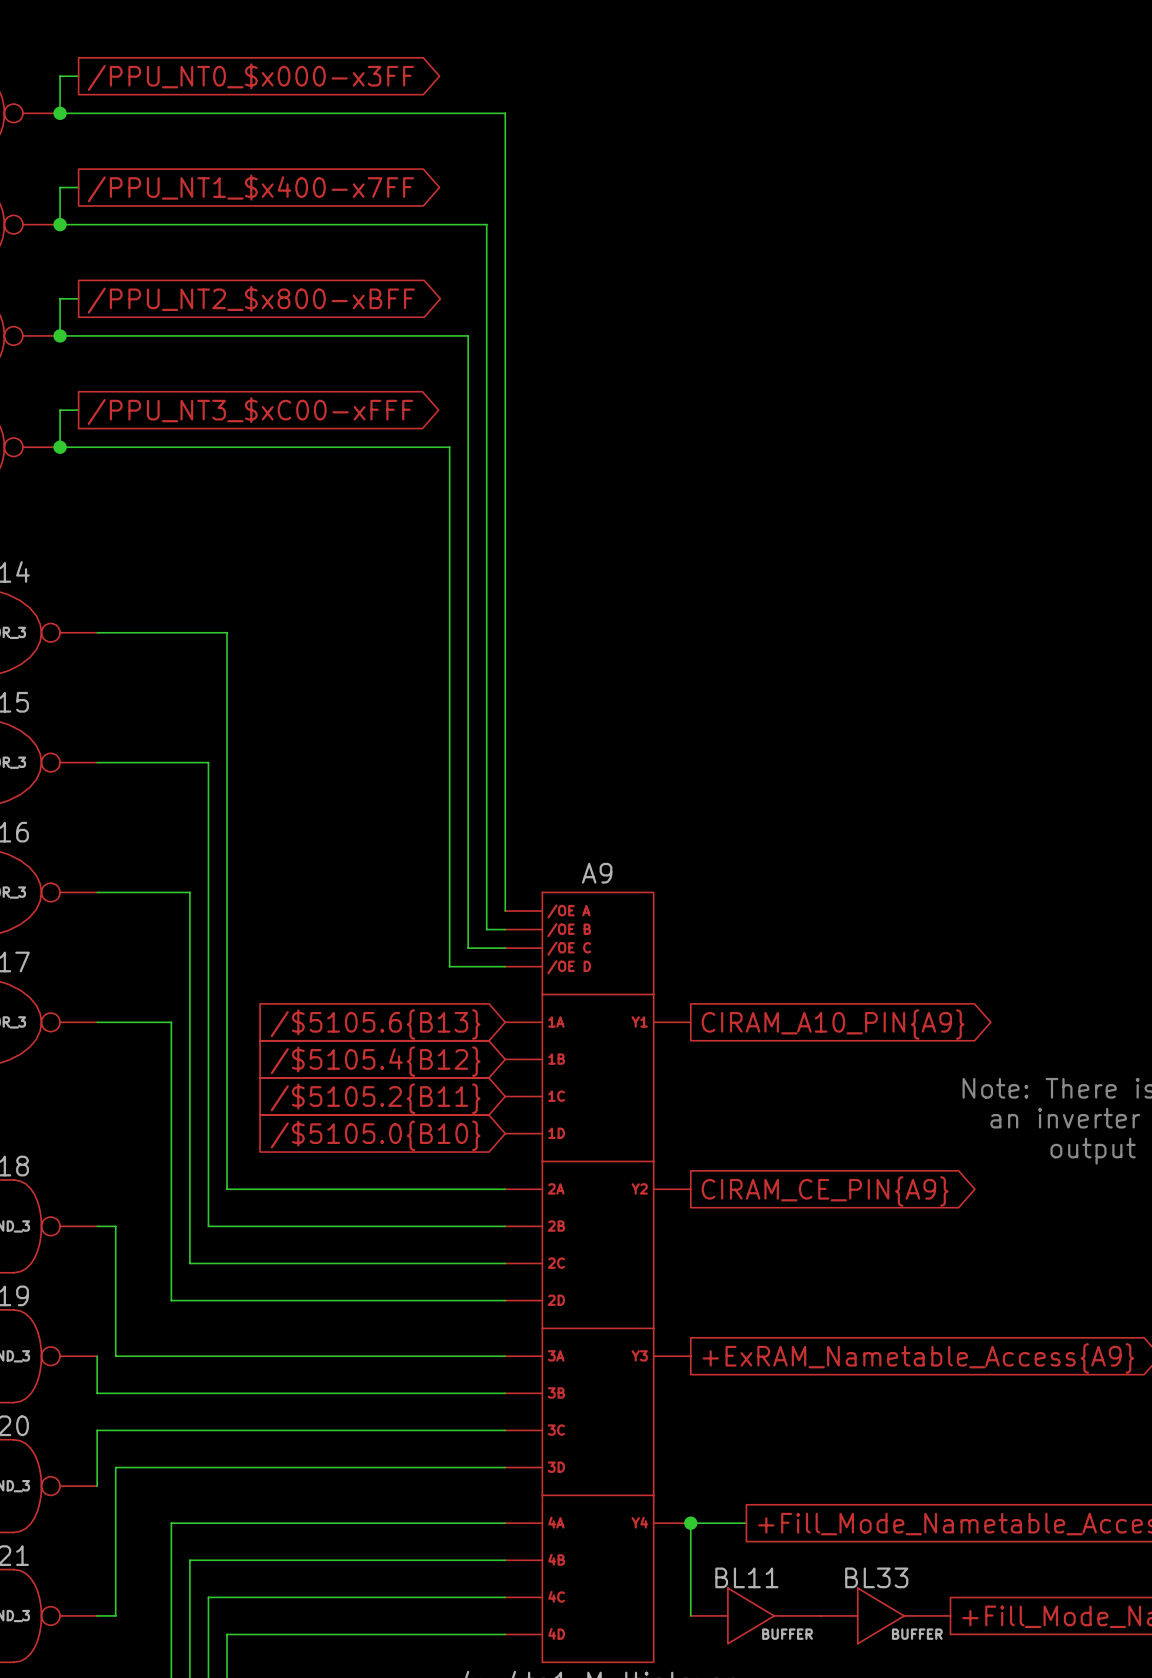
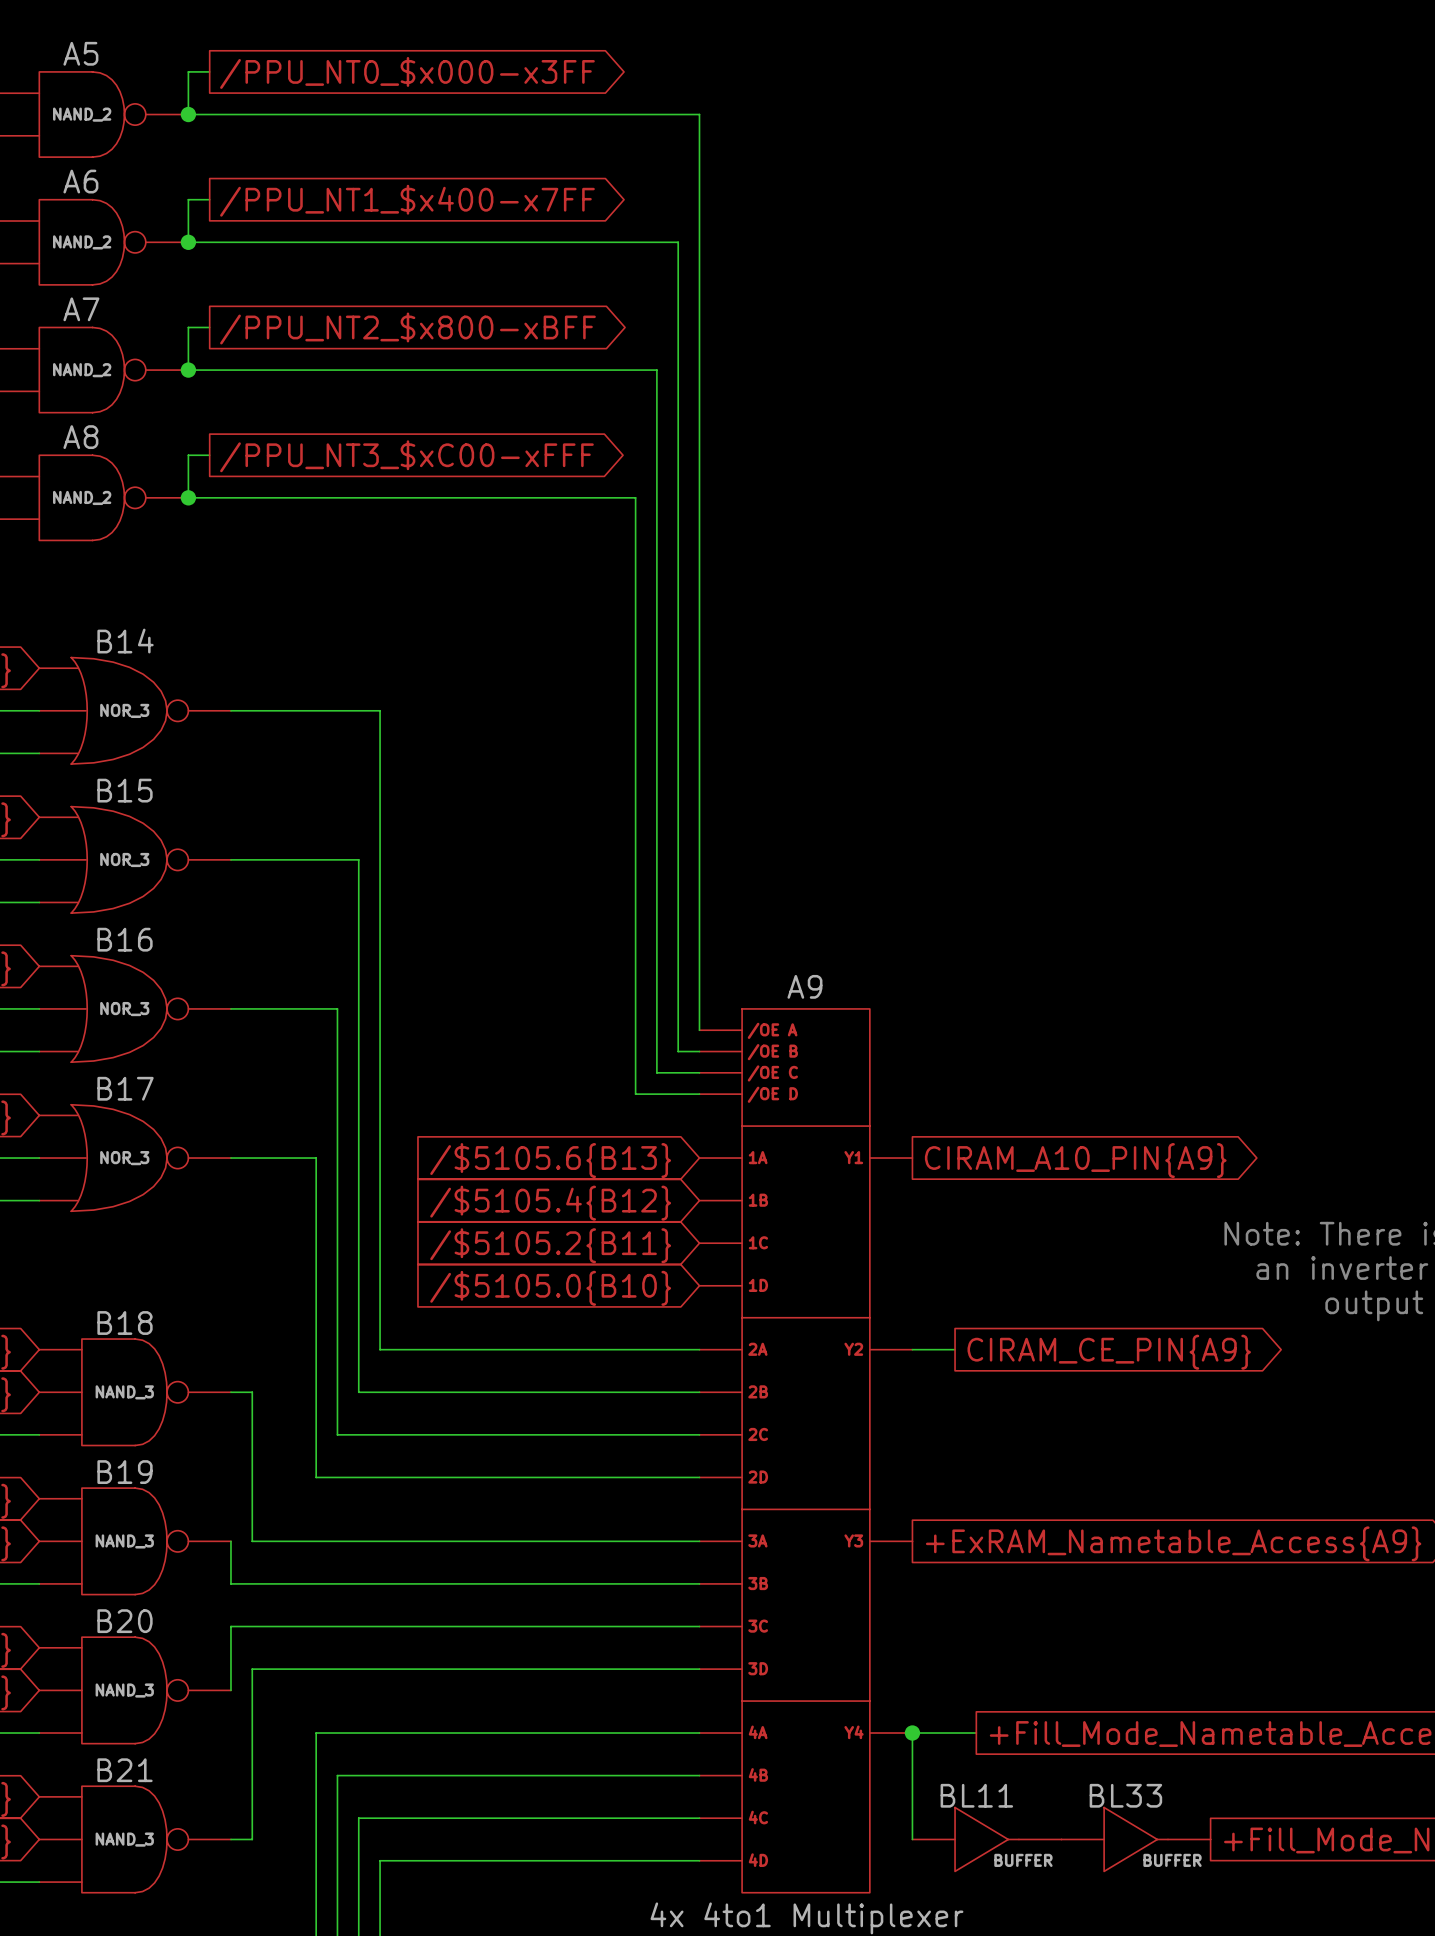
wire: none -> (912, 1349) (955, 1349)
global label position: CIRAM_CE_PIN{A9} (825, 1191) -> CIRAM_CE_PIN{A9} (1109, 1352)

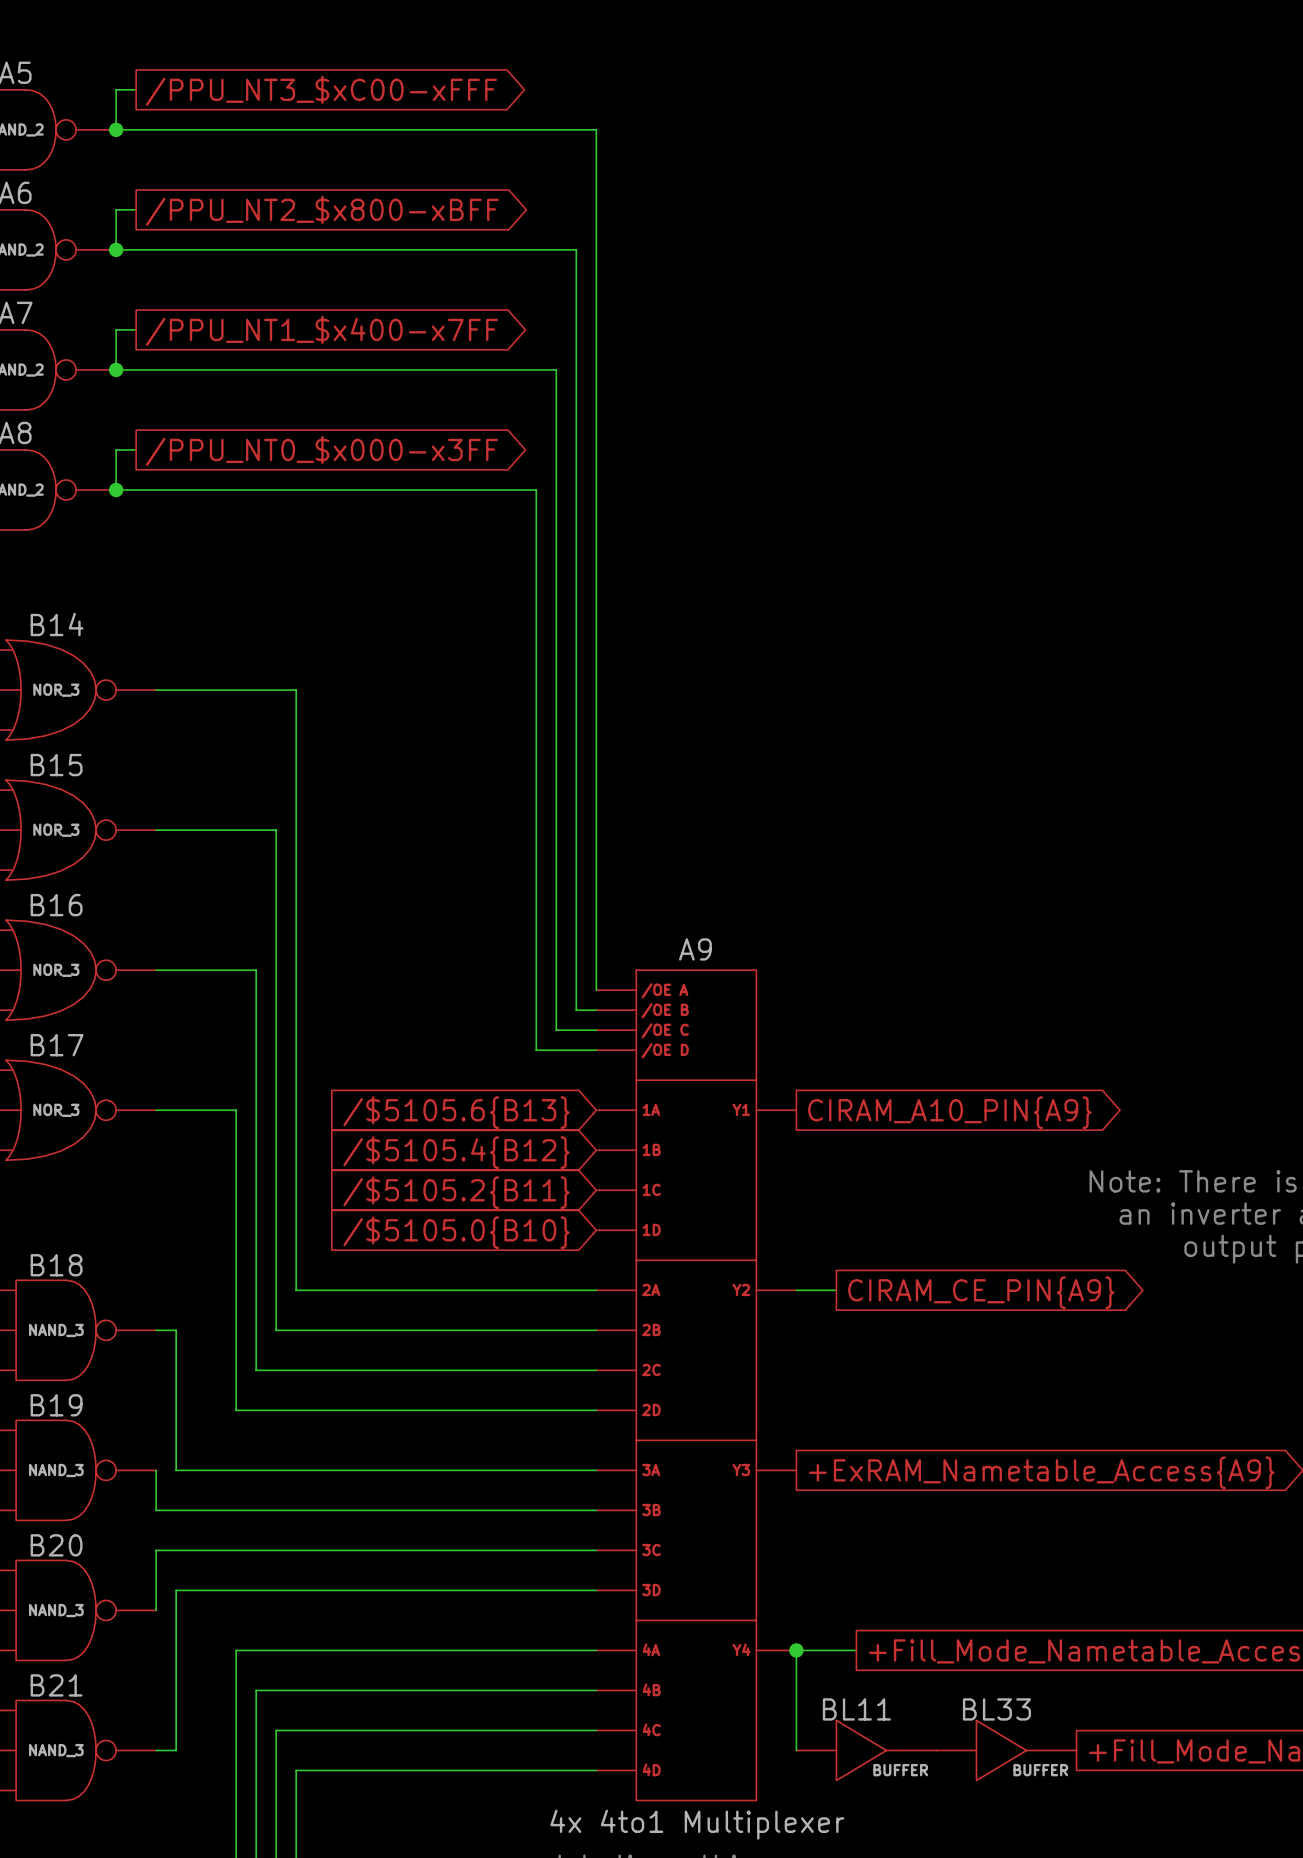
global label: /PPU_NT0_$x000-x3FF (407, 72) -> /PPU_NT3_$xC00-xFFF (321, 90)
global label: /PPU_NT1_$x400-x7FF (407, 200) -> /PPU_NT2_$x800-xBFF (322, 210)
global label: /PPU_NT2_$x800-xBFF (407, 328) -> /PPU_NT1_$x400-x7FF (321, 330)
global label: /PPU_NT3_$xC00-xFFF (406, 456) -> /PPU_NT0_$x000-x3FF (321, 450)

